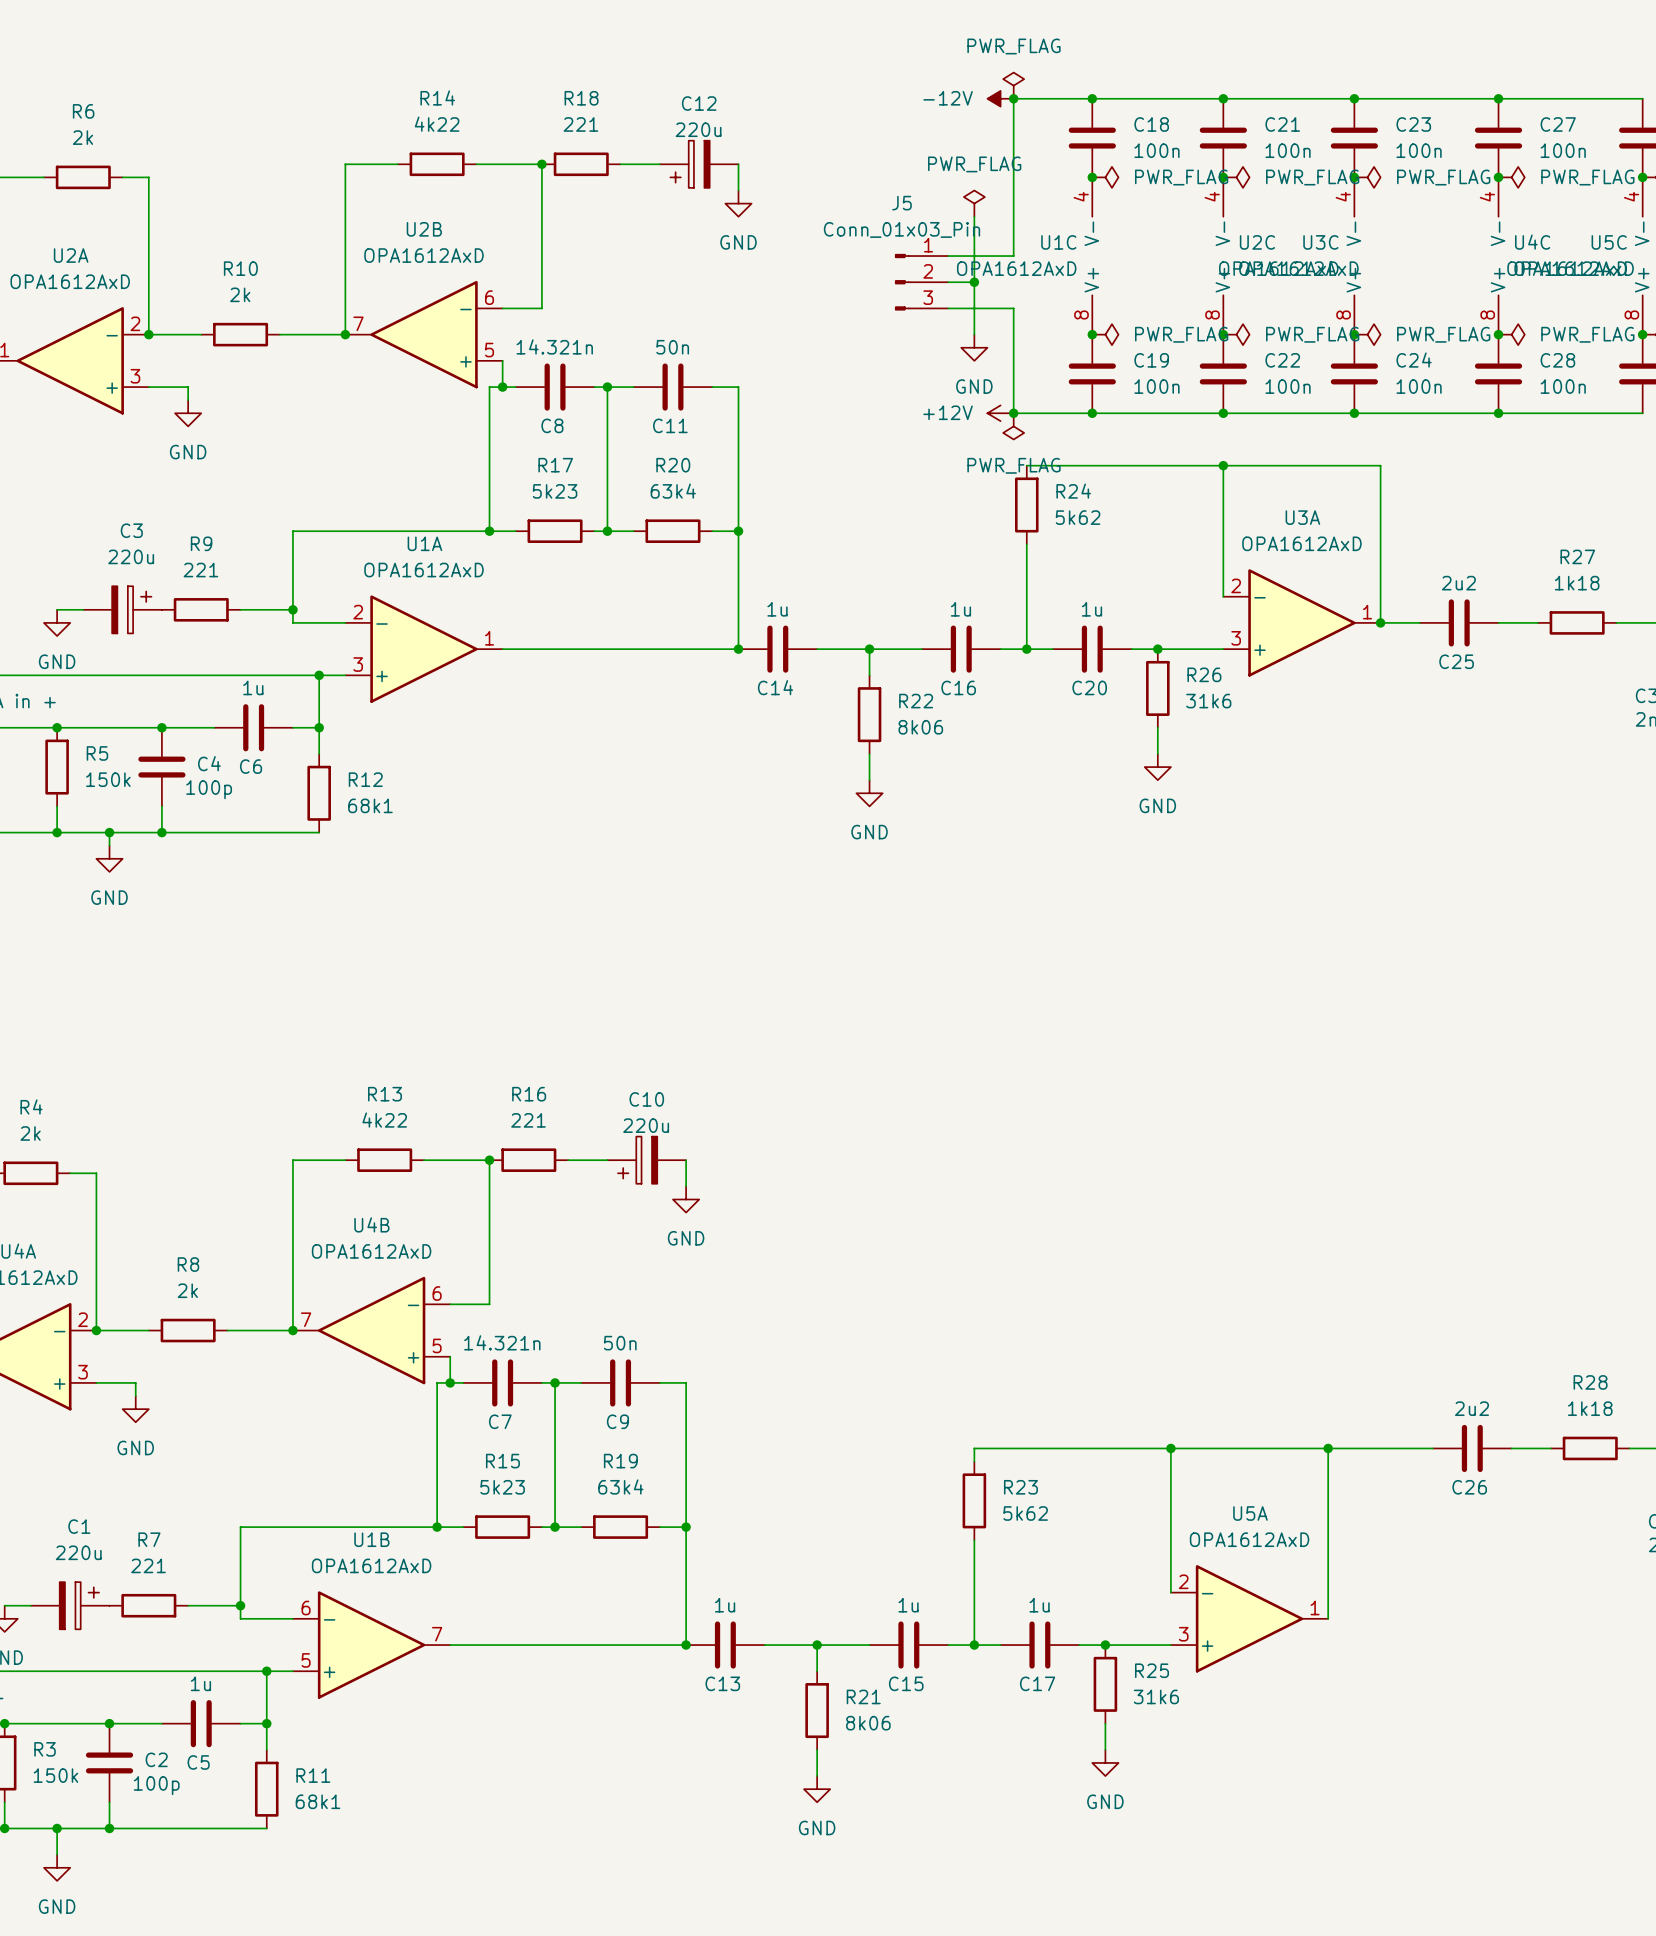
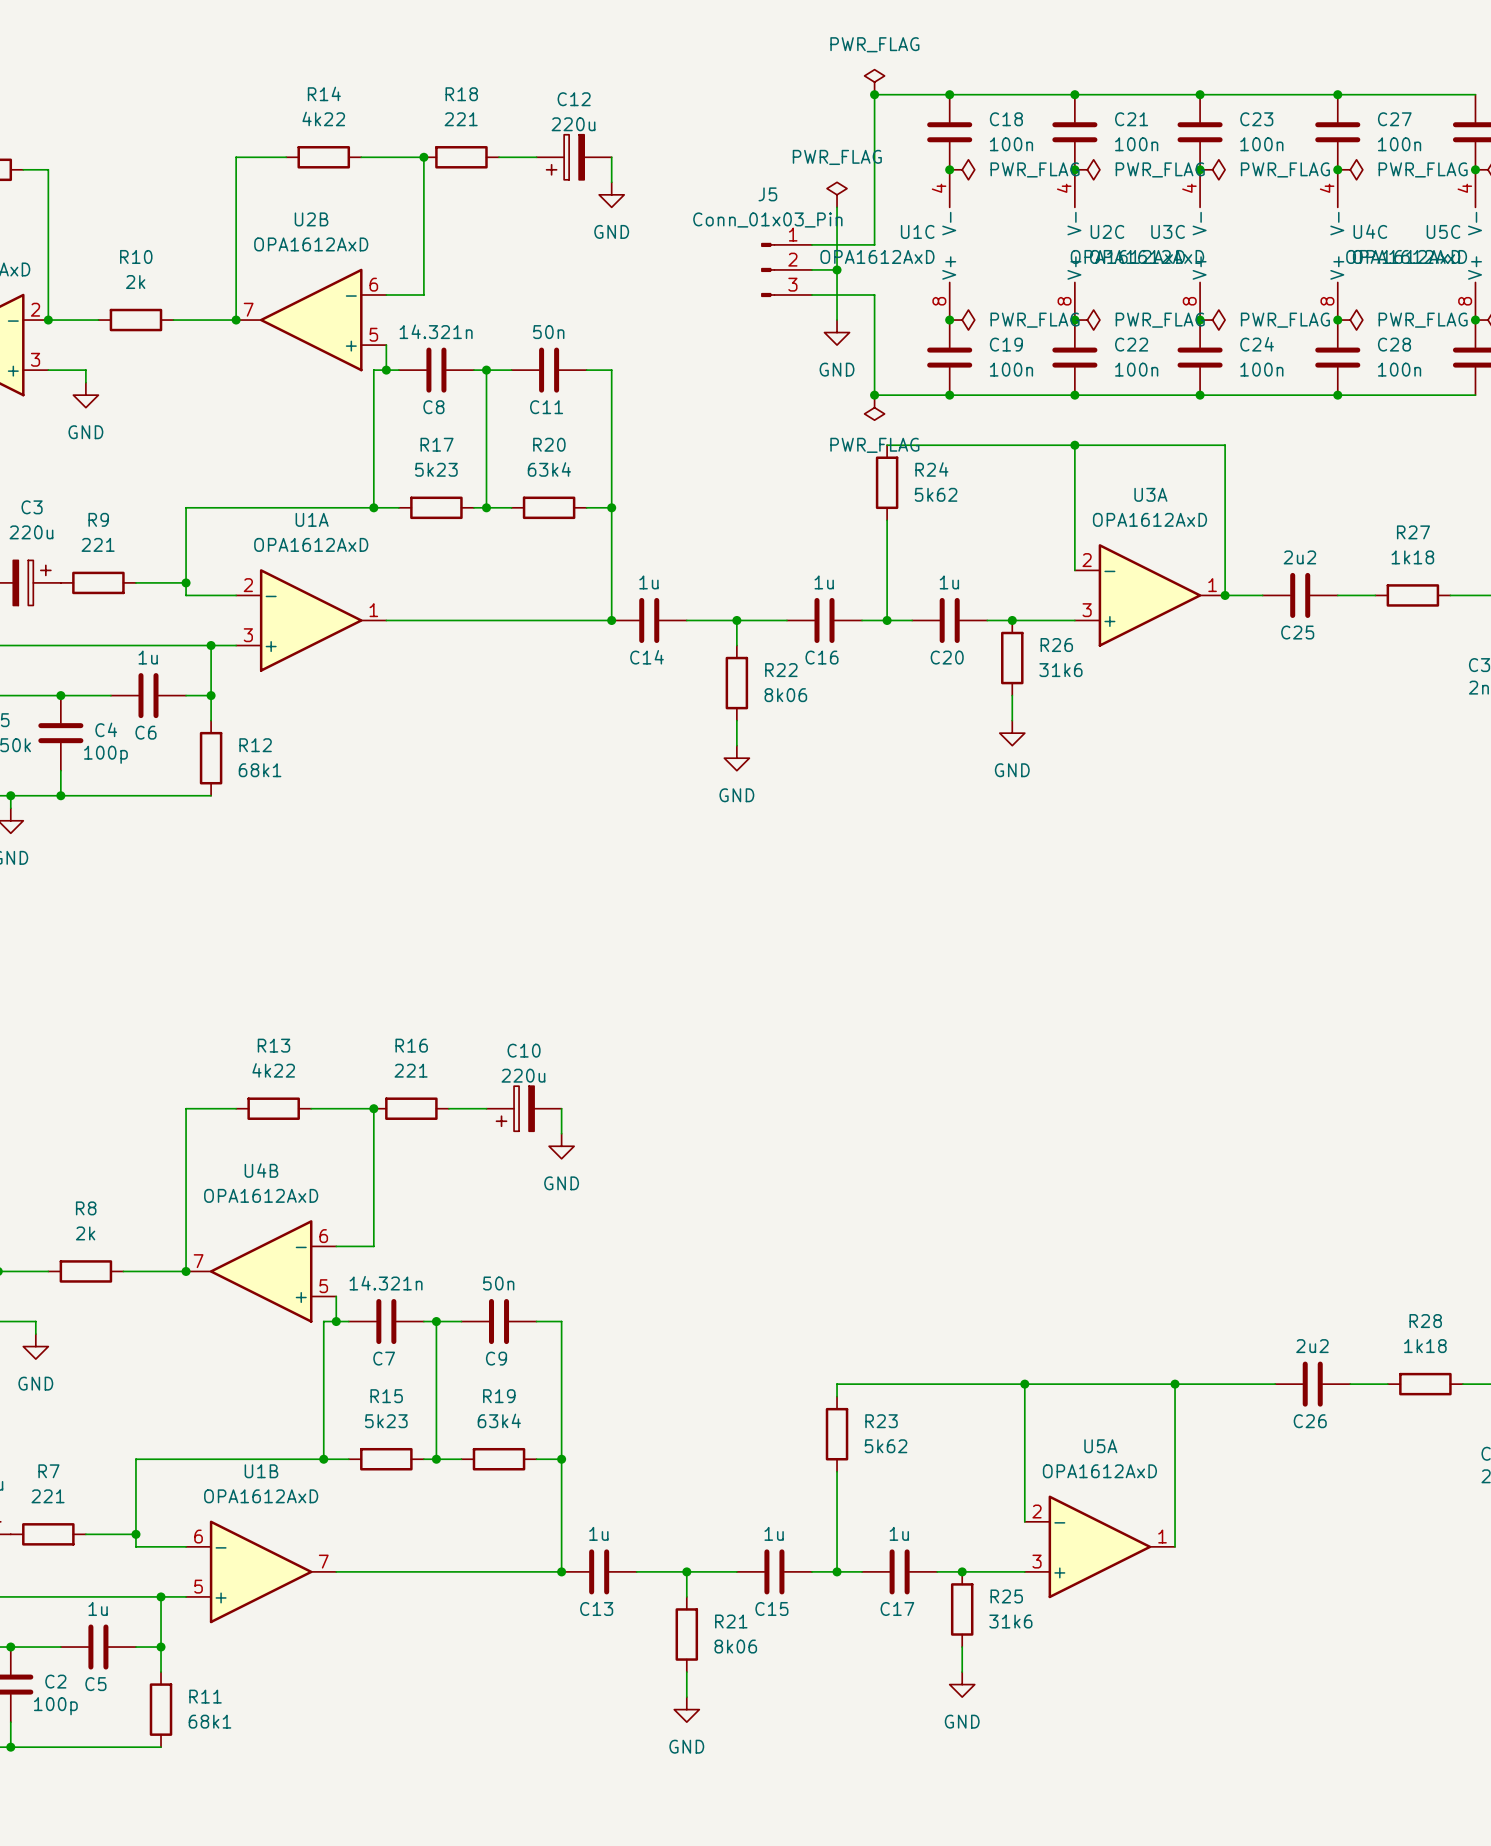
power symbol: -12V (1000, 98) -> none
power symbol: +12V (1000, 413) -> none

